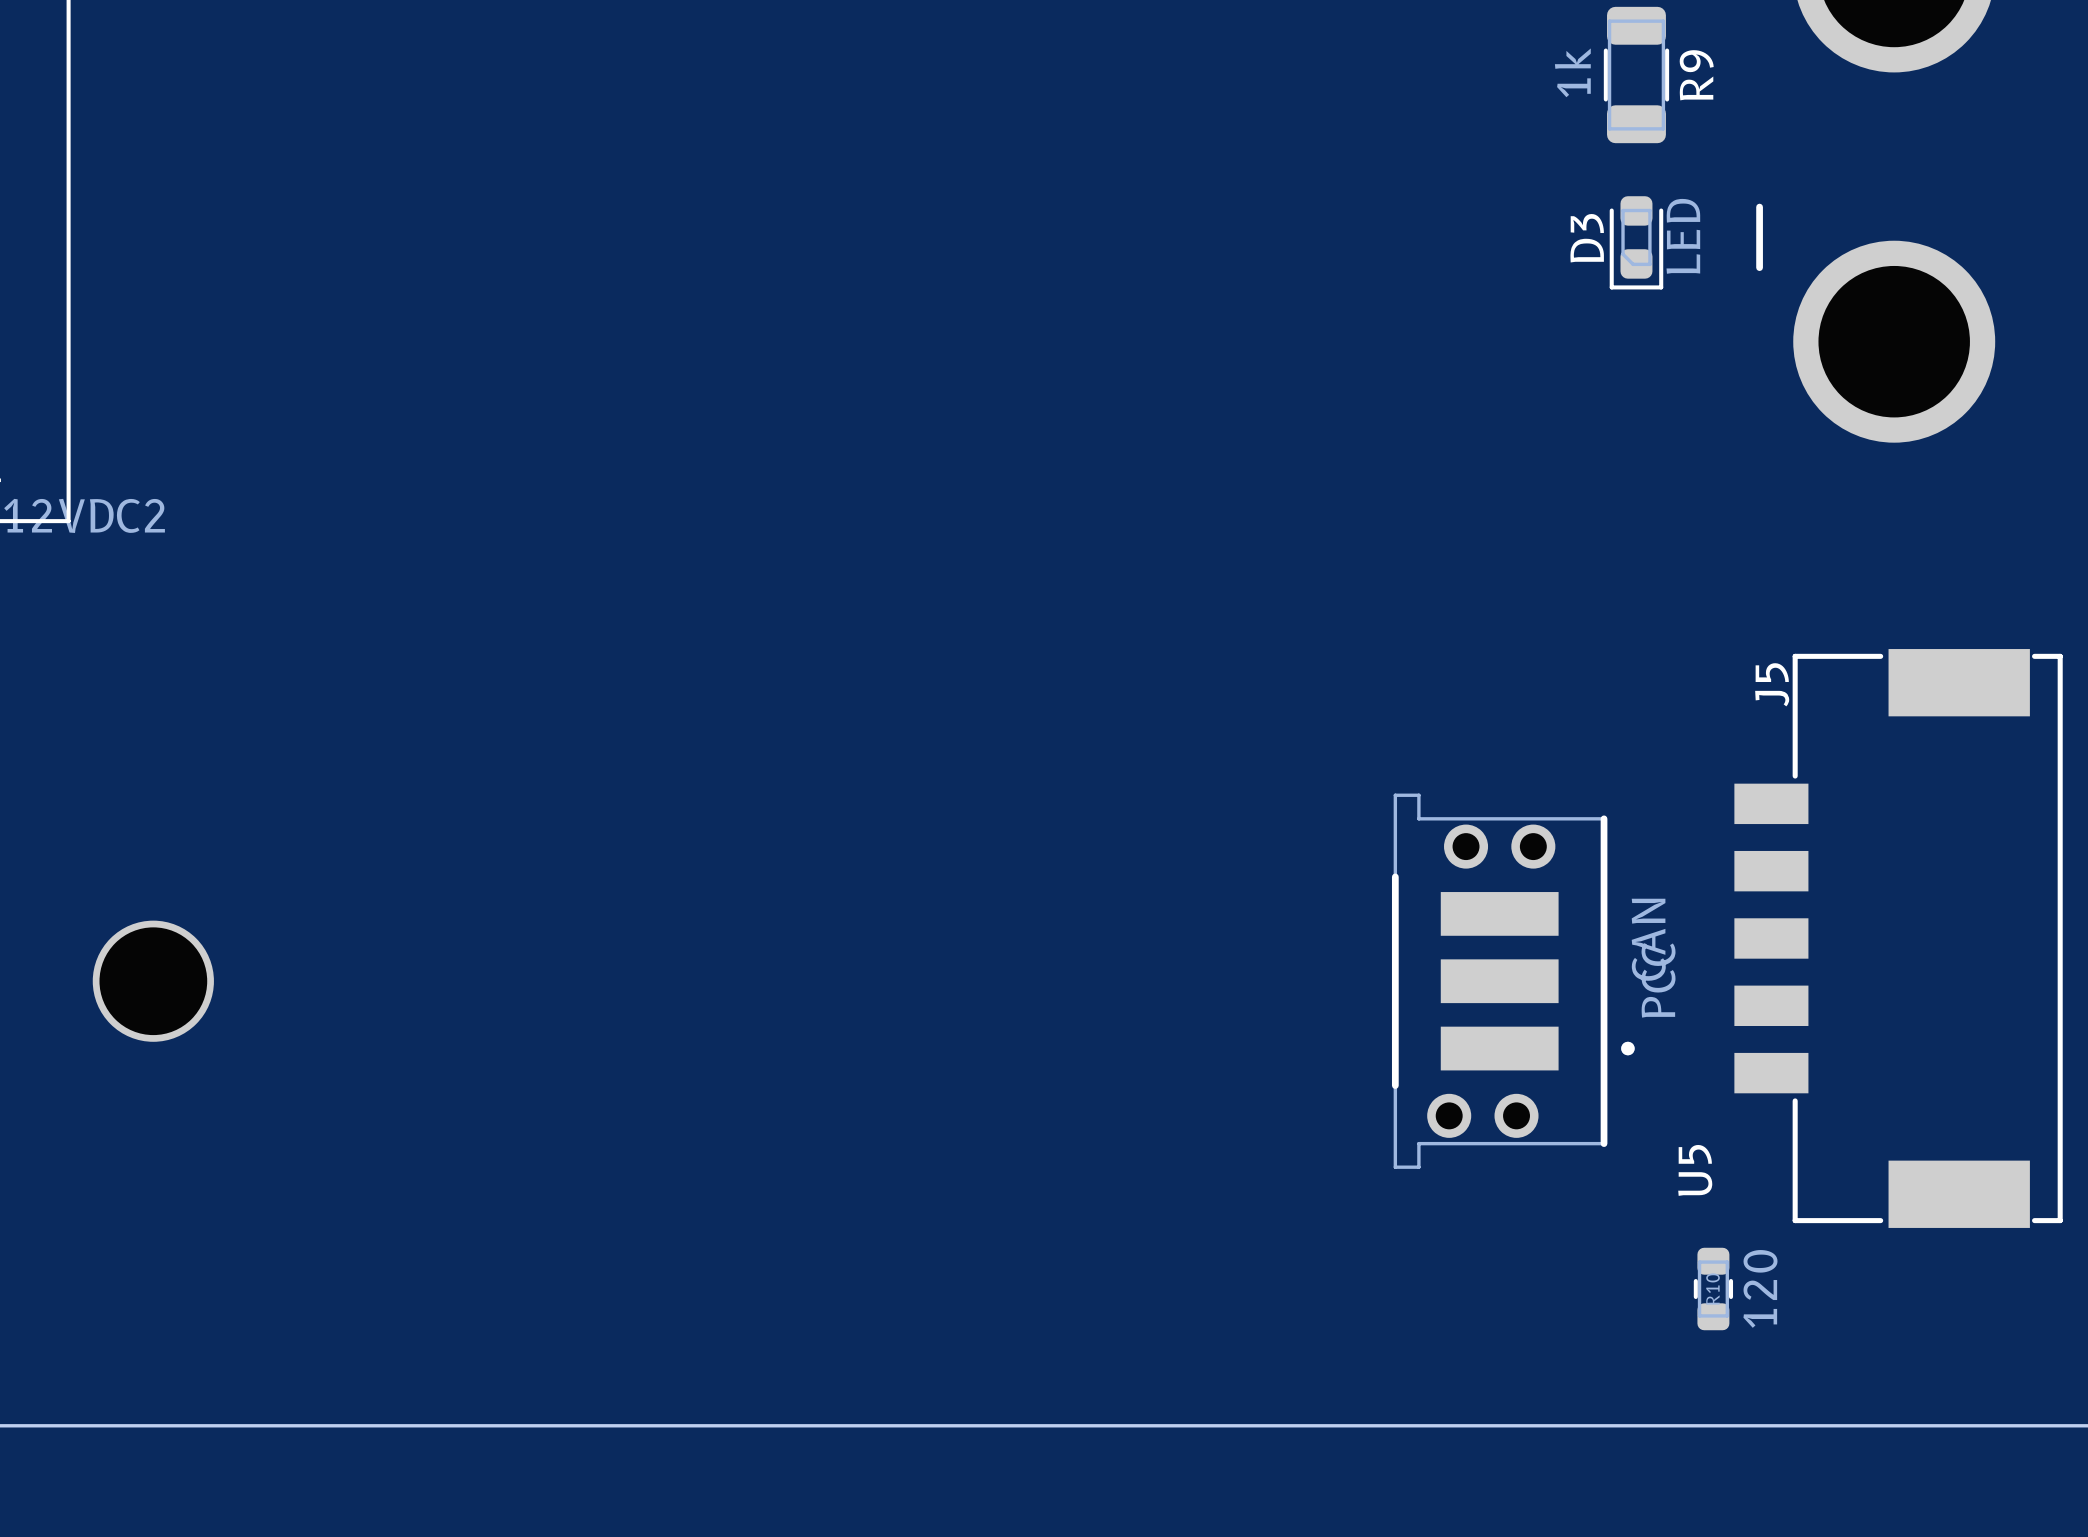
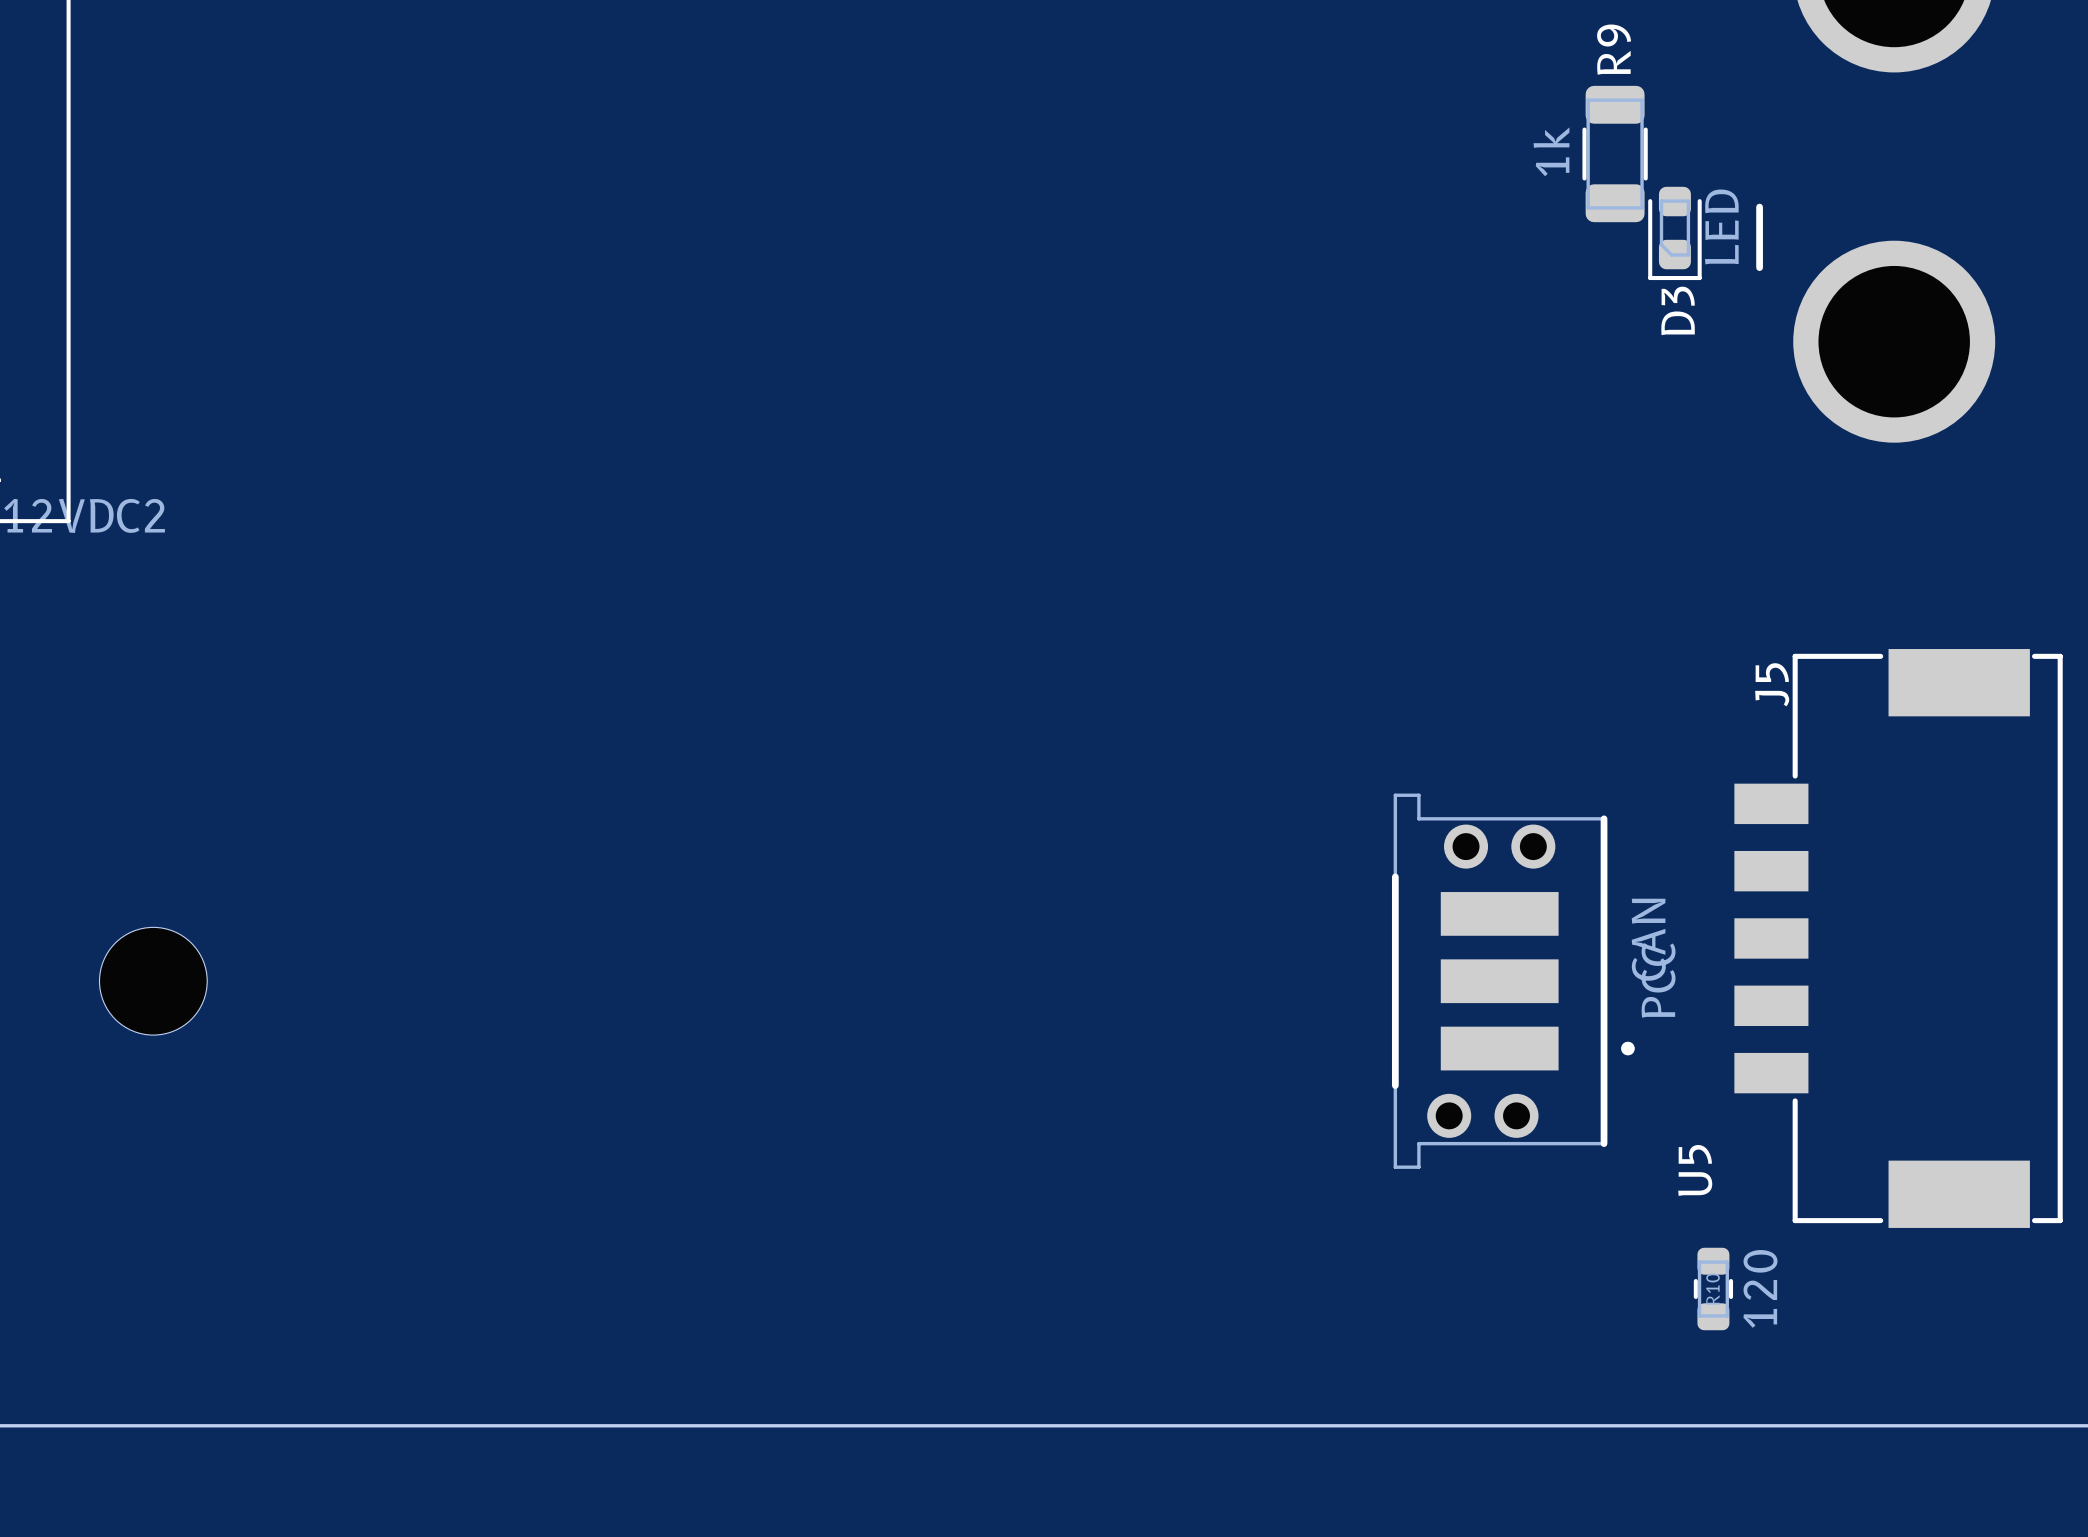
R9 position: (1636, 75) -> (1615, 154)
R9 name position: R9 (1696, 75) -> R9 (1614, 49)
D3 name position: D3 (1587, 238) -> D3 (1678, 310)
D3 position: (1636, 242) -> (1674, 233)
U5 footprint: [92, 793, 1635, 1169] -> [99, 793, 1635, 1169]

